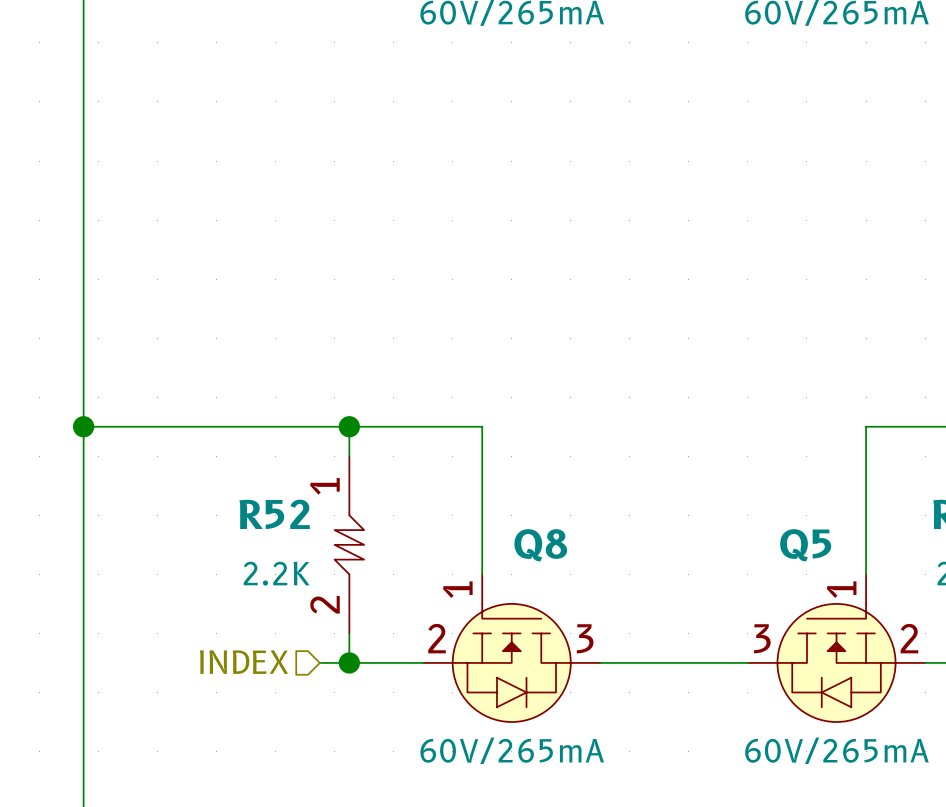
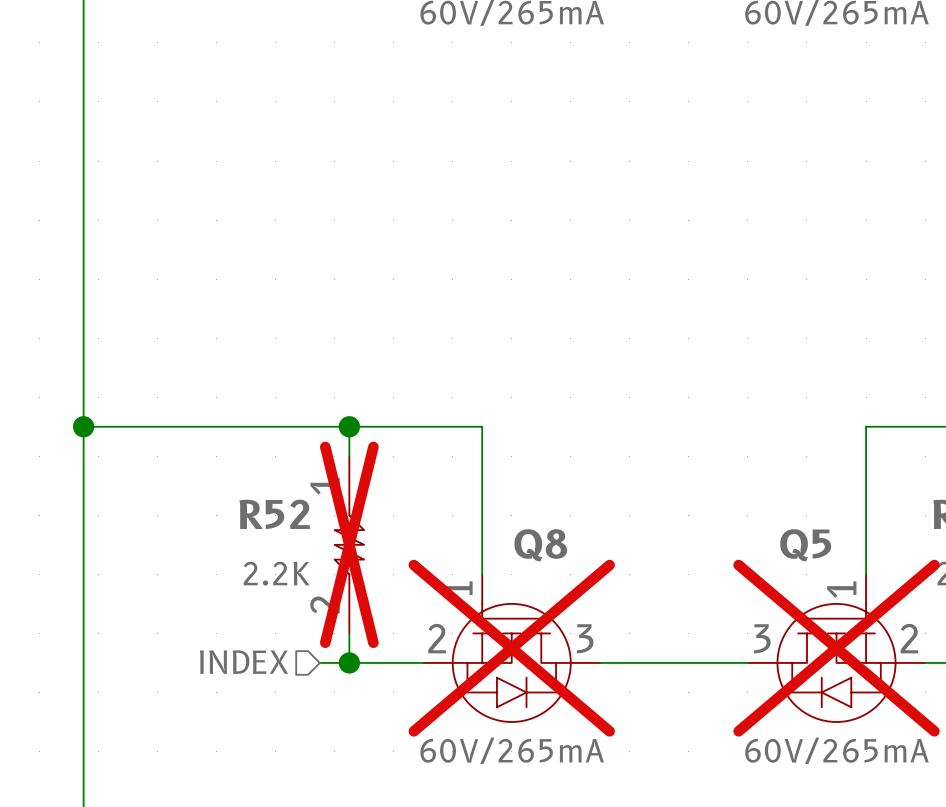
R52 do-not-place cross: none -> (349, 544)
Q8 do-not-place cross: none -> (511, 648)
Q5 do-not-place cross: none -> (836, 648)

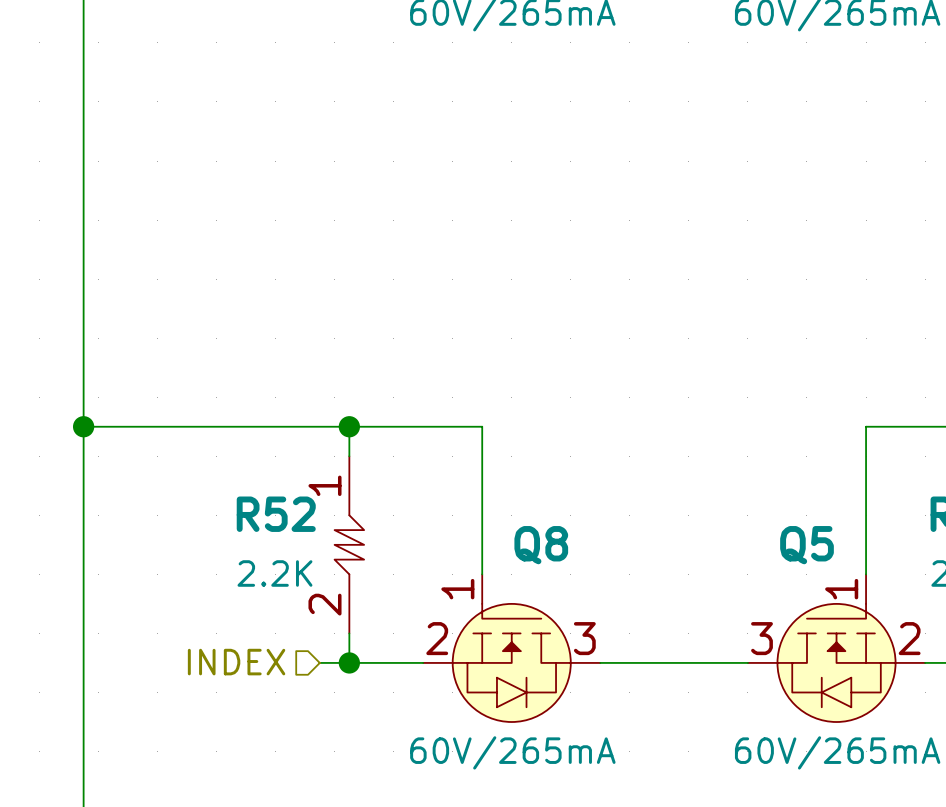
R52 do-not-place cross: (349, 544) -> none
Q8 do-not-place cross: (511, 648) -> none
Q5 do-not-place cross: (836, 648) -> none

